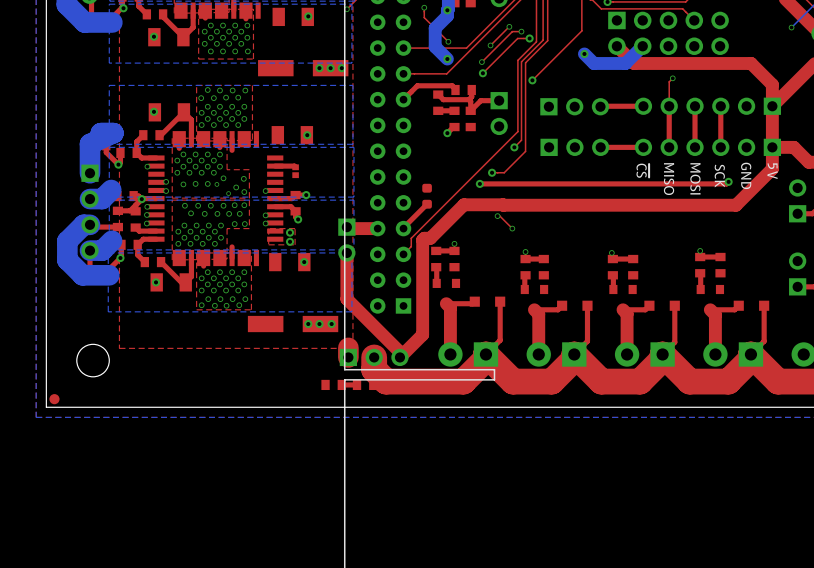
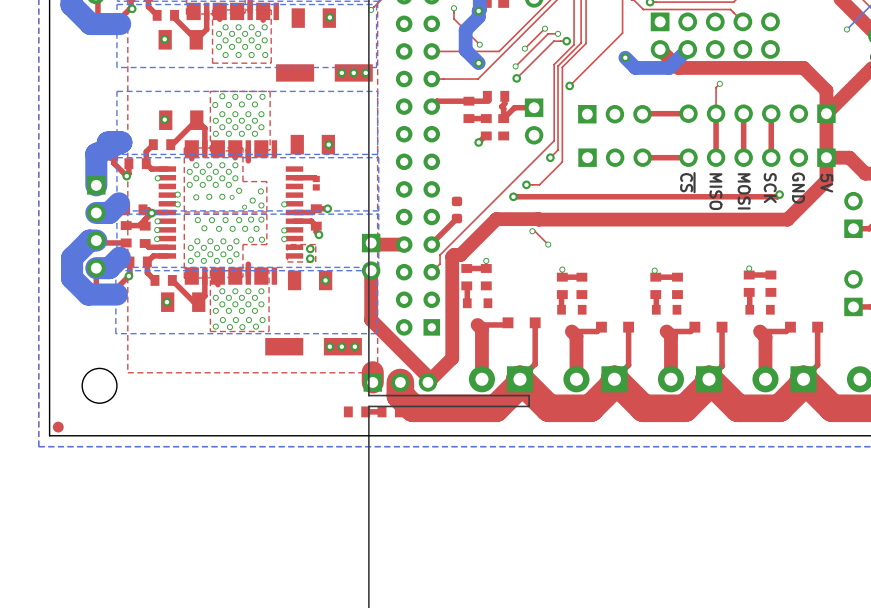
top track: (455, 90) (452, 85) (417, 85) (403, 99) -> none
top track: (438, 94) (443, 99) (468, 99) -> none
top track: none -> (488, 101) (436, 101)

